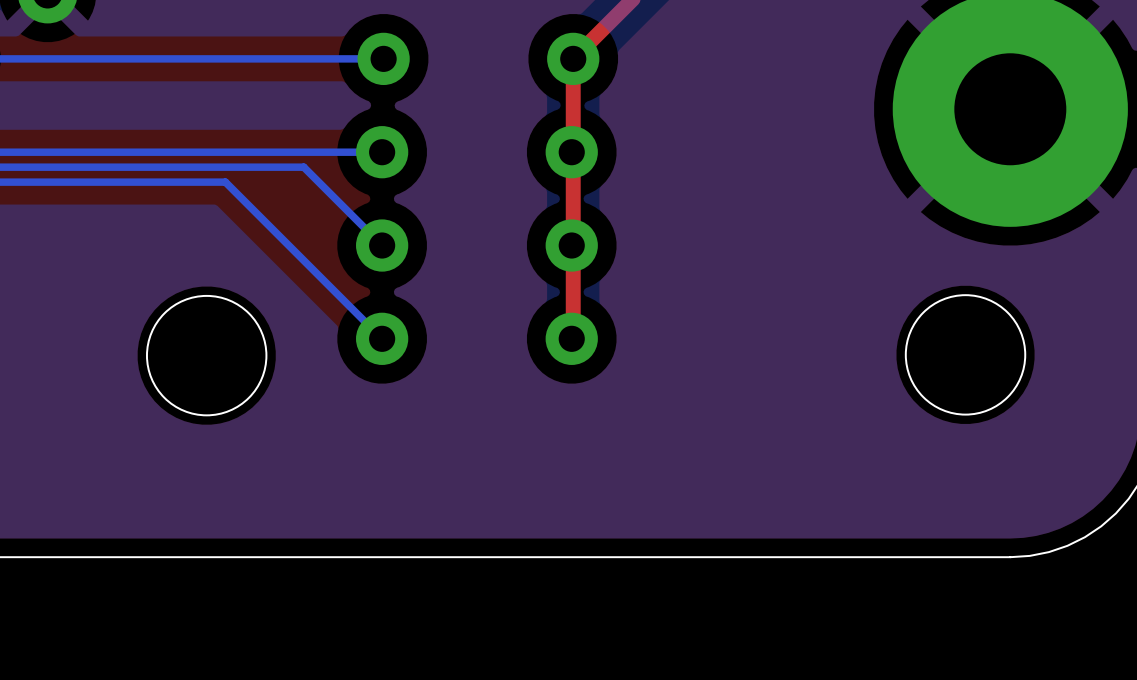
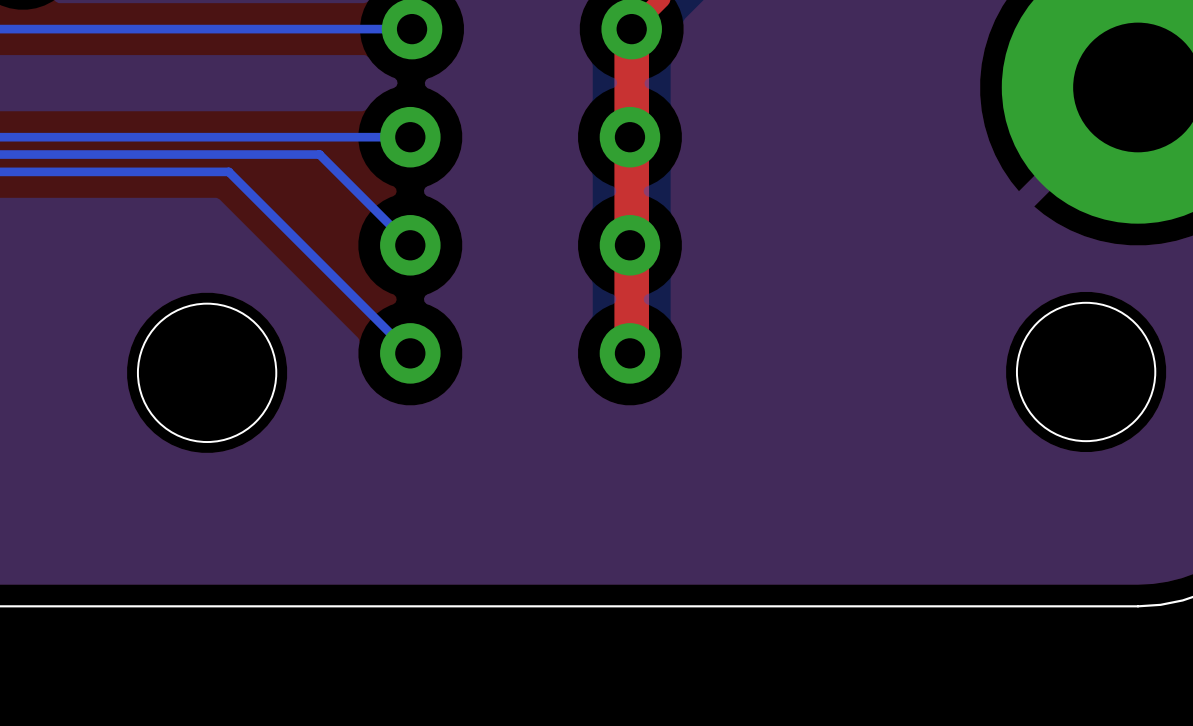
top track width: thin (573, 58) (573, 337) -> thick (631, 29) (631, 351)

